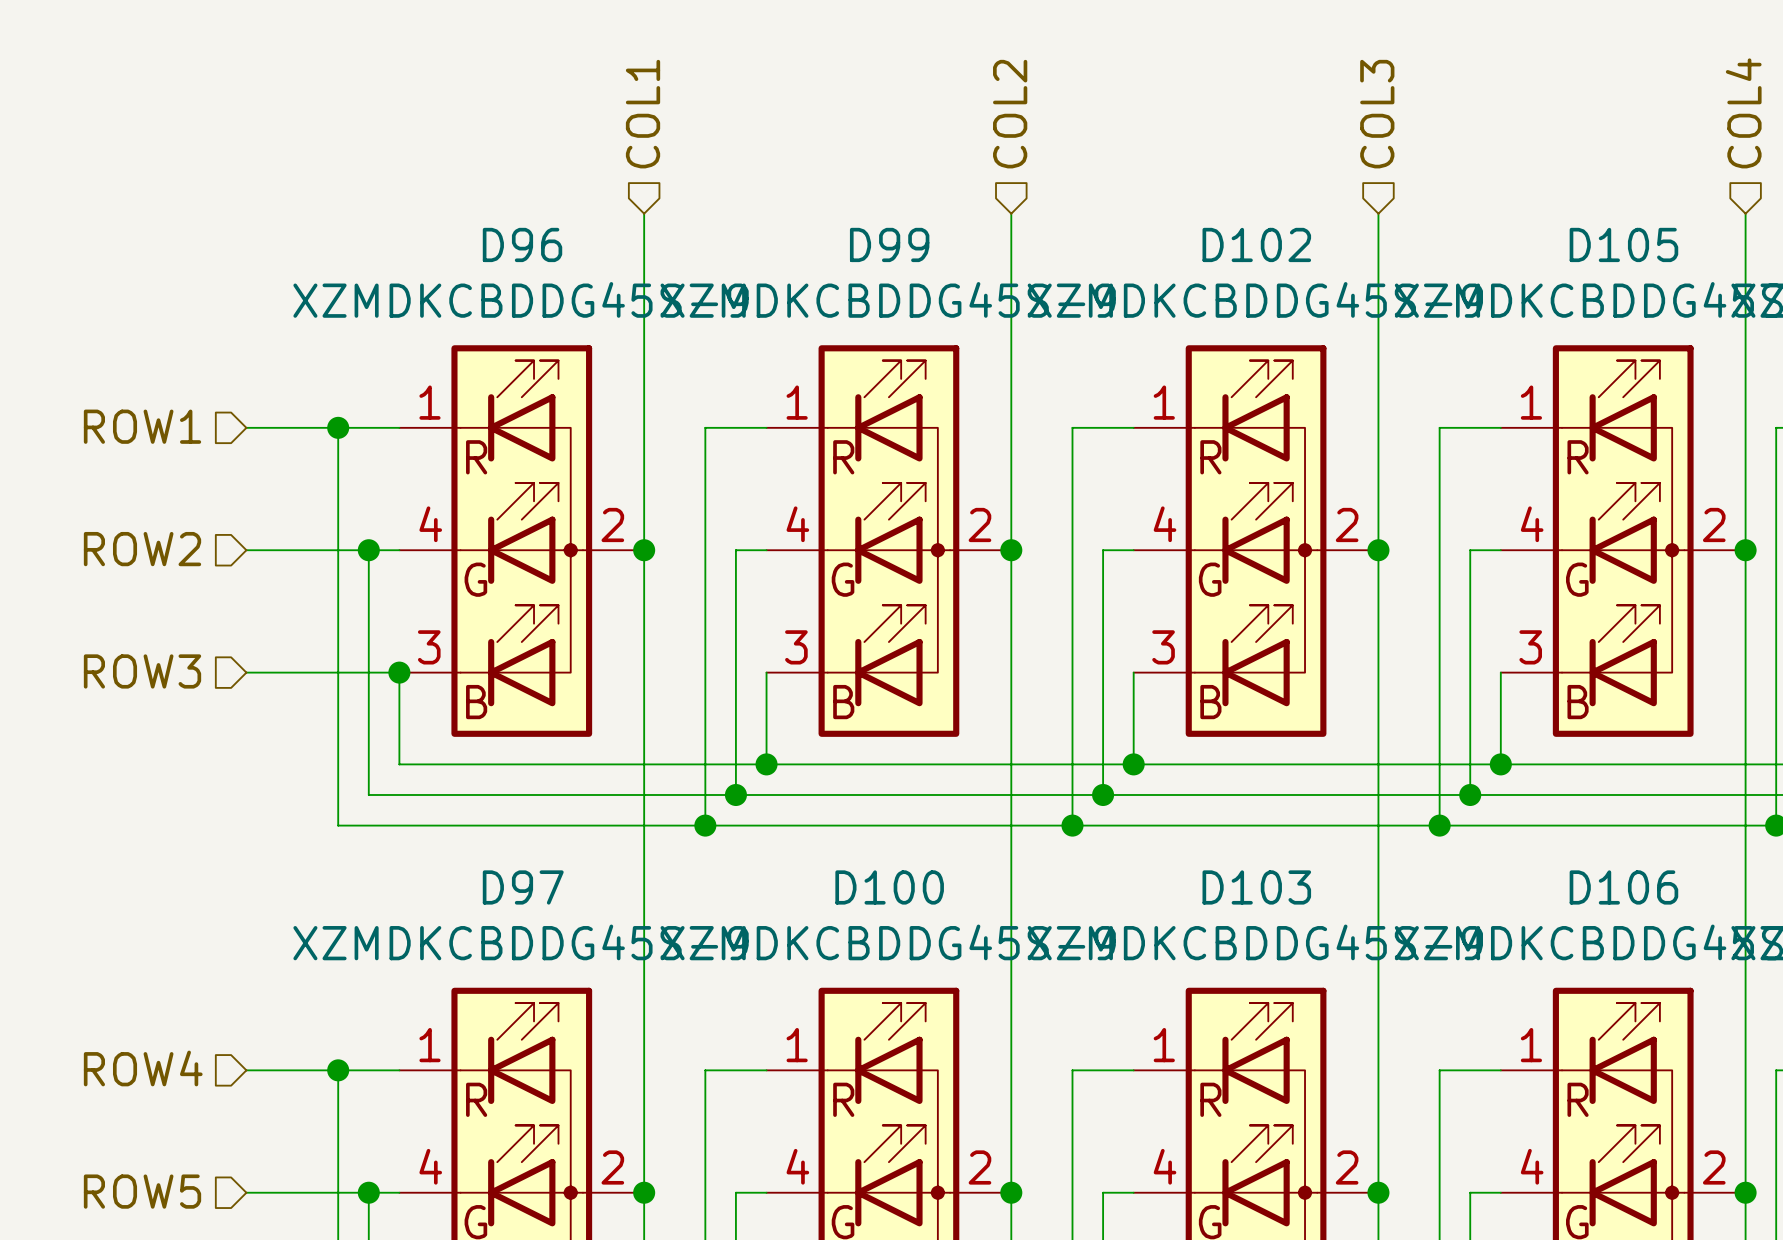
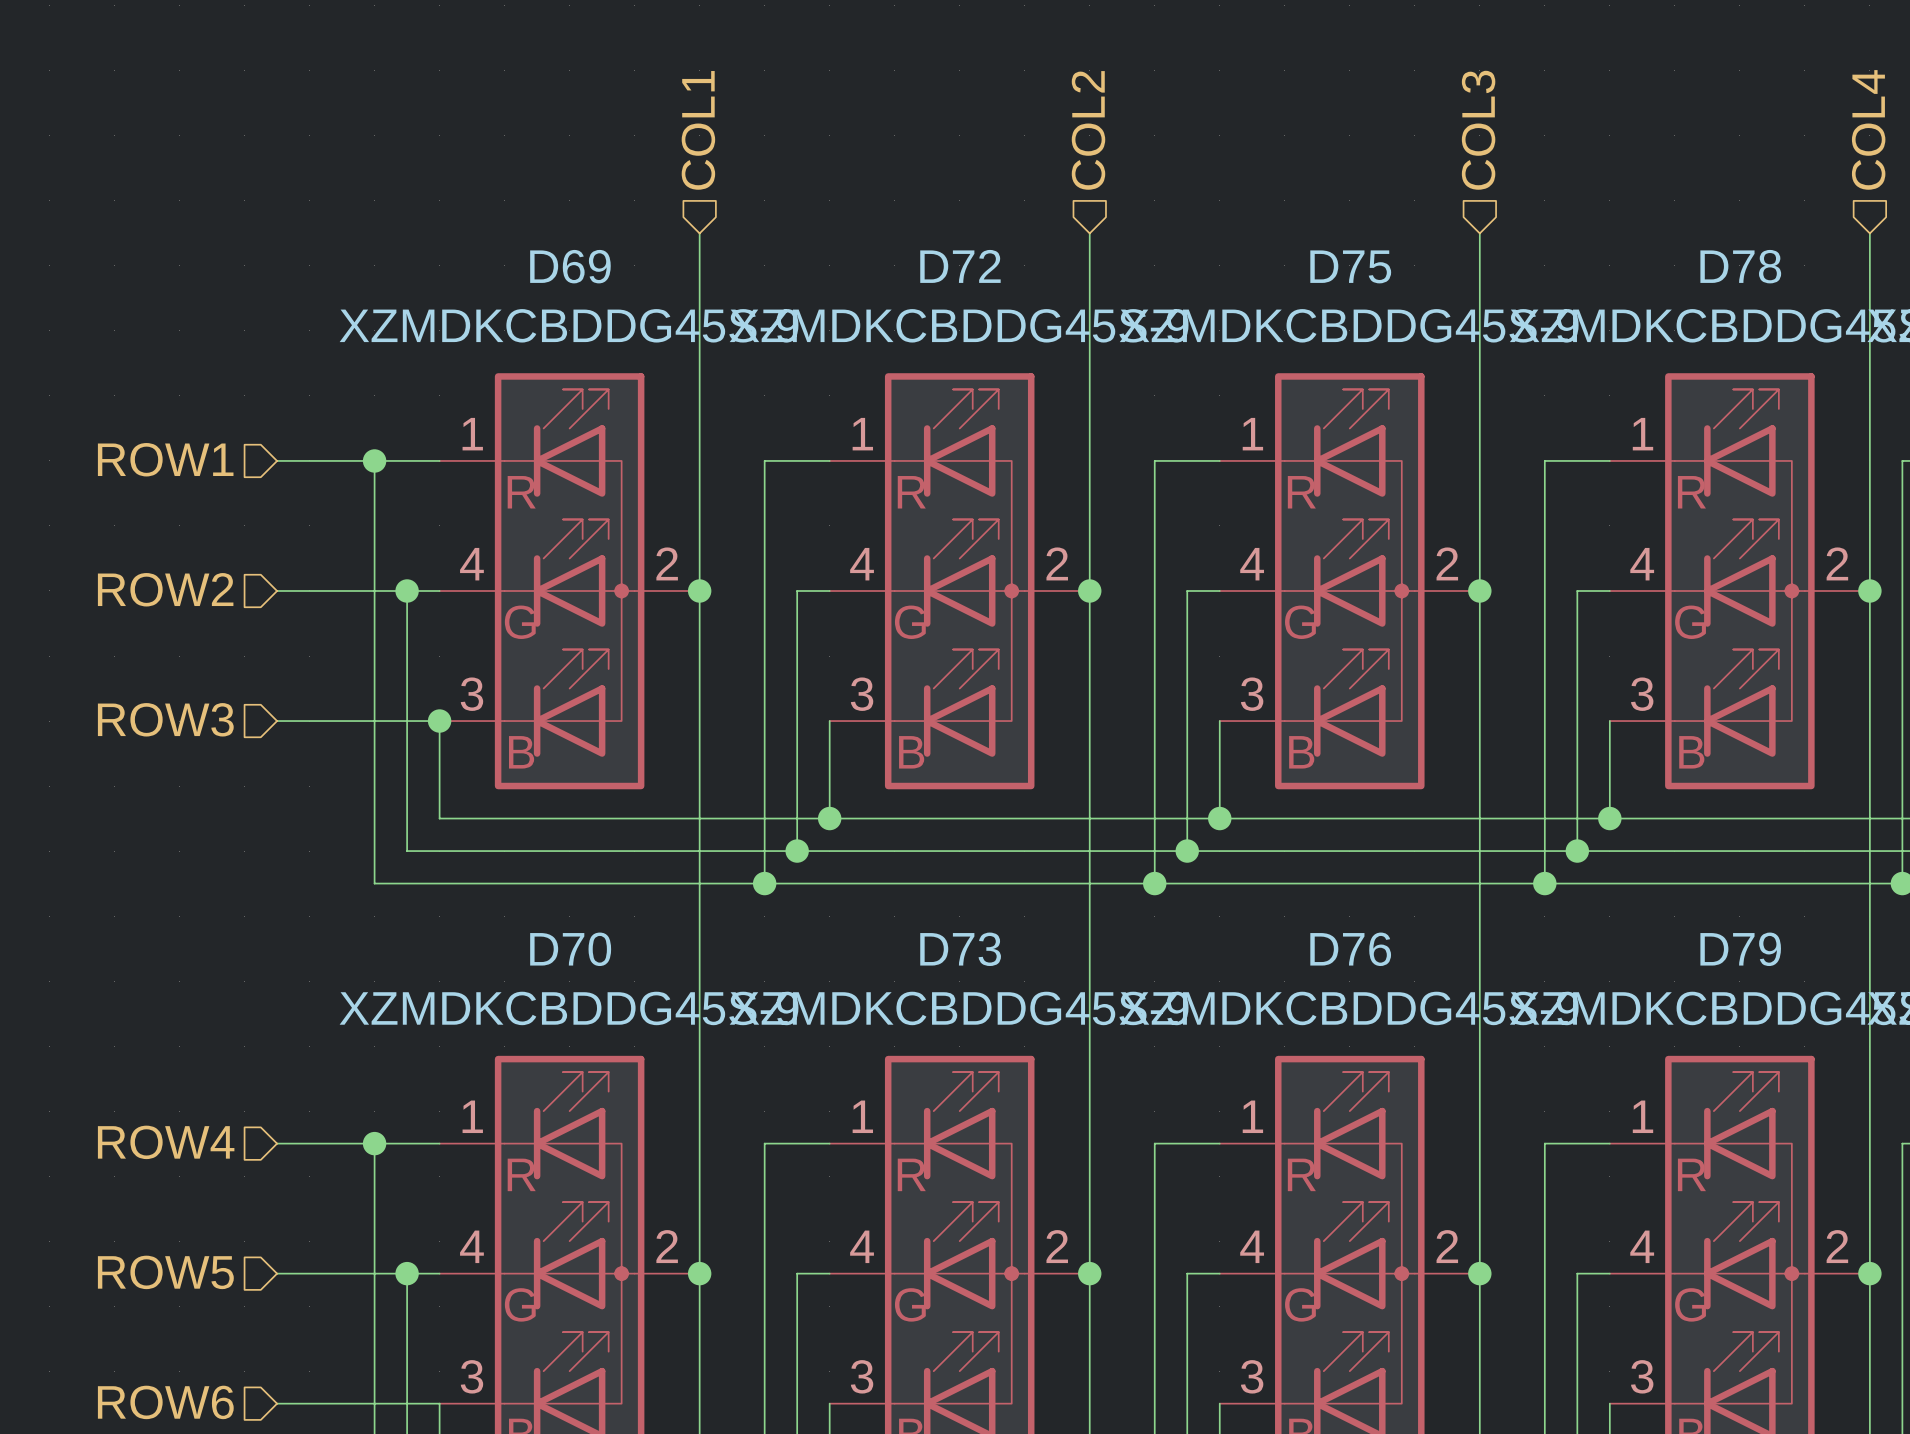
D96 name: D96 (522, 244) -> D69 (570, 266)
D99 name: D99 (889, 244) -> D72 (960, 266)
D102 name: D102 (1256, 244) -> D75 (1350, 266)
D105 name: D105 (1623, 244) -> D78 (1740, 266)
D97 name: D97 (523, 887) -> D70 (570, 949)
D100 name: D100 (889, 887) -> D73 (960, 949)
D103 name: D103 (1256, 887) -> D76 (1350, 949)
D106 name: D106 (1623, 887) -> D79 (1740, 949)

